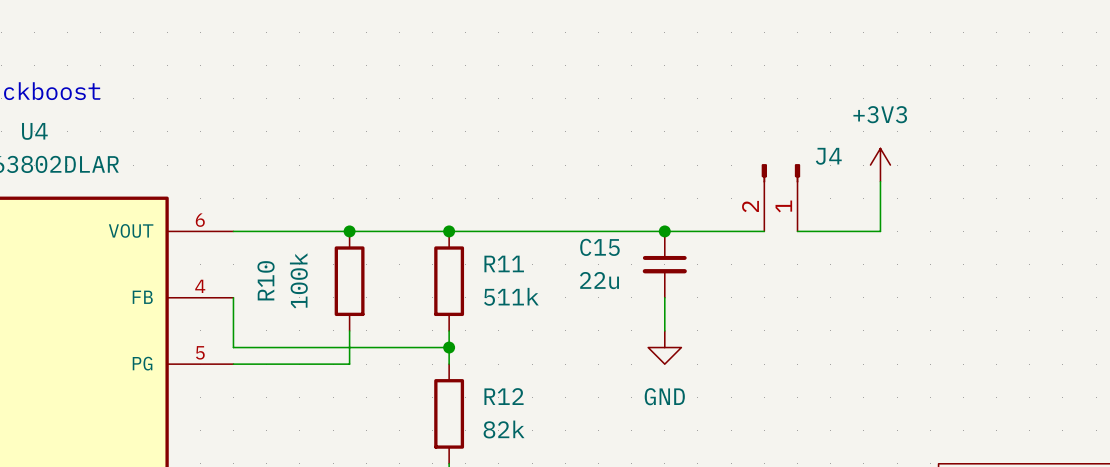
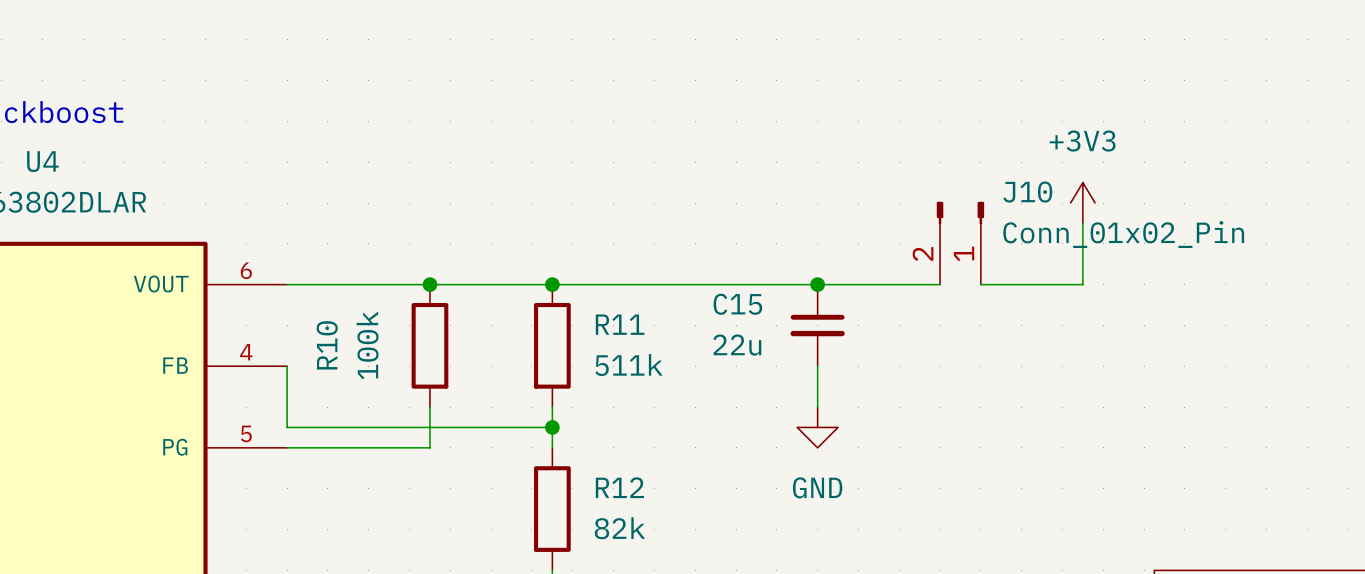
J4 name: J4 (828, 156) -> J10 (1027, 192)
J4 value: none -> Conn_01x02_Pin (1123, 234)

